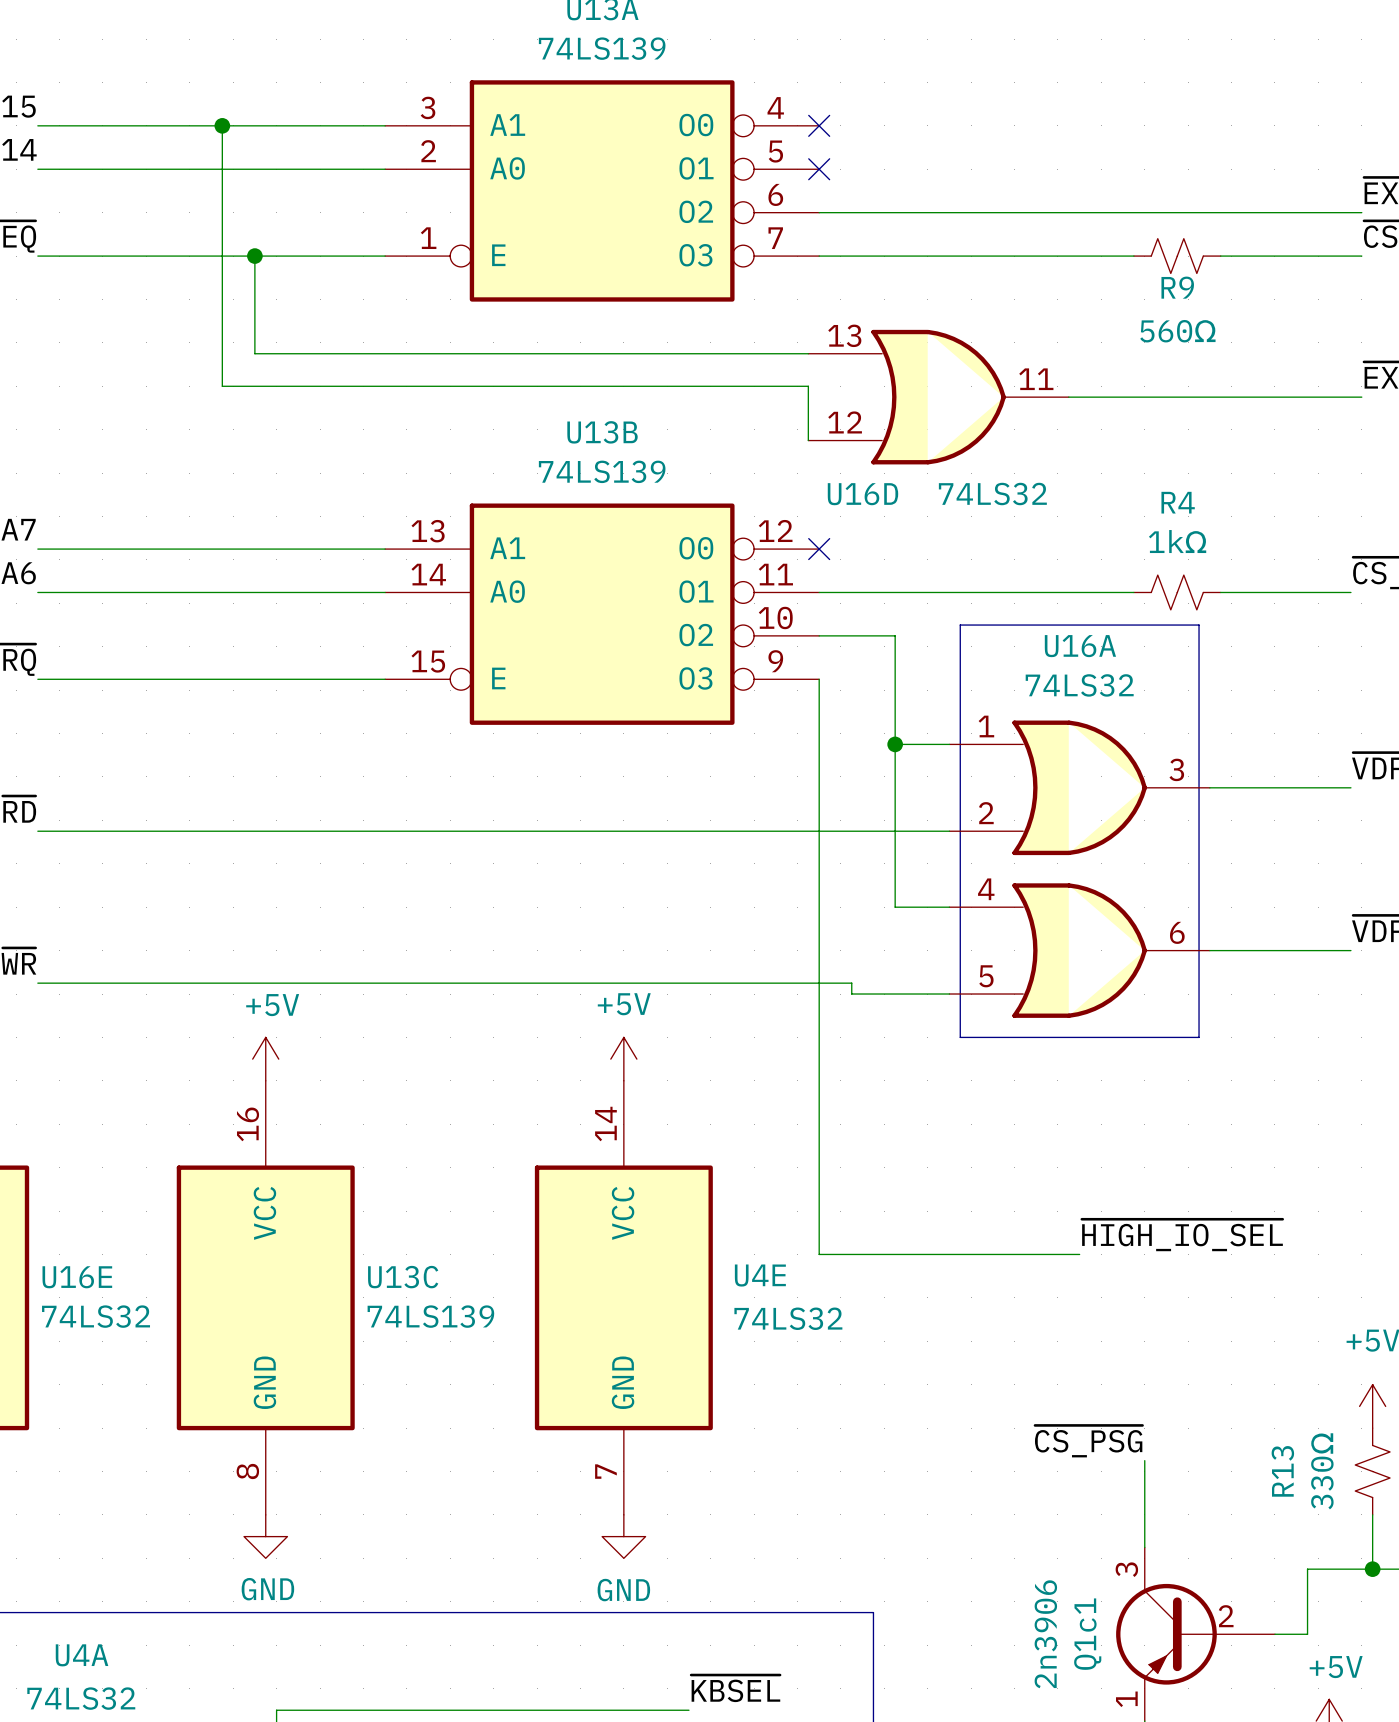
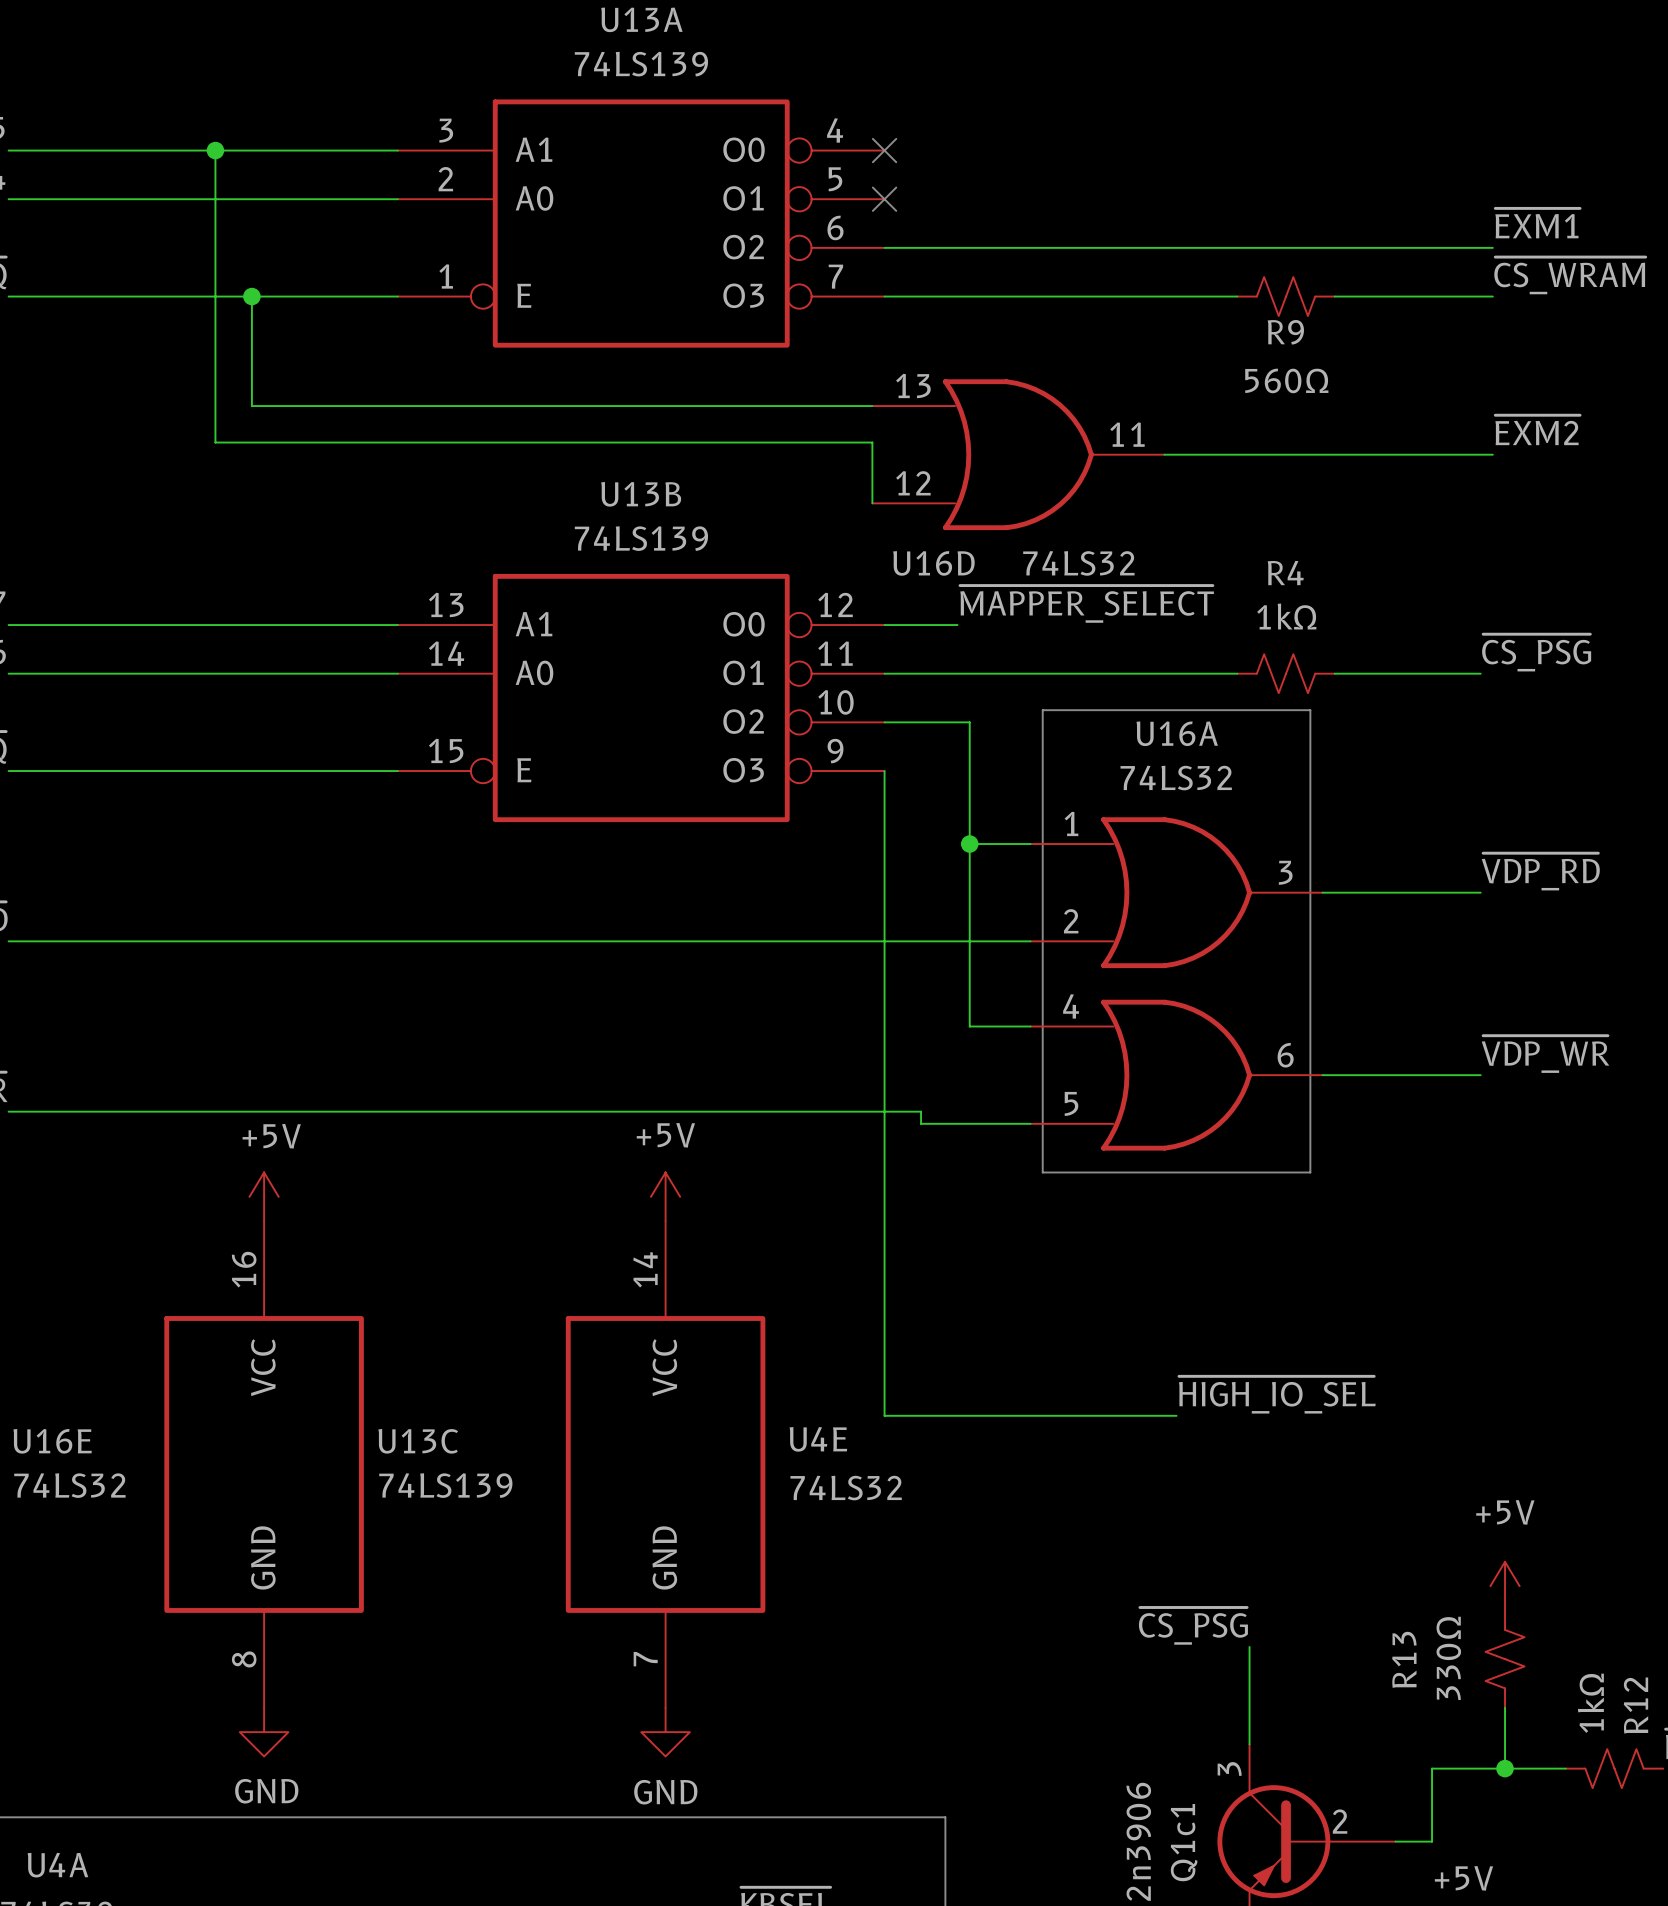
label: none -> ~{MAPPER_SELECT} (1086, 604)
wire: none -> (884, 625) (957, 625)
no-connect mark: (819, 549) -> none

